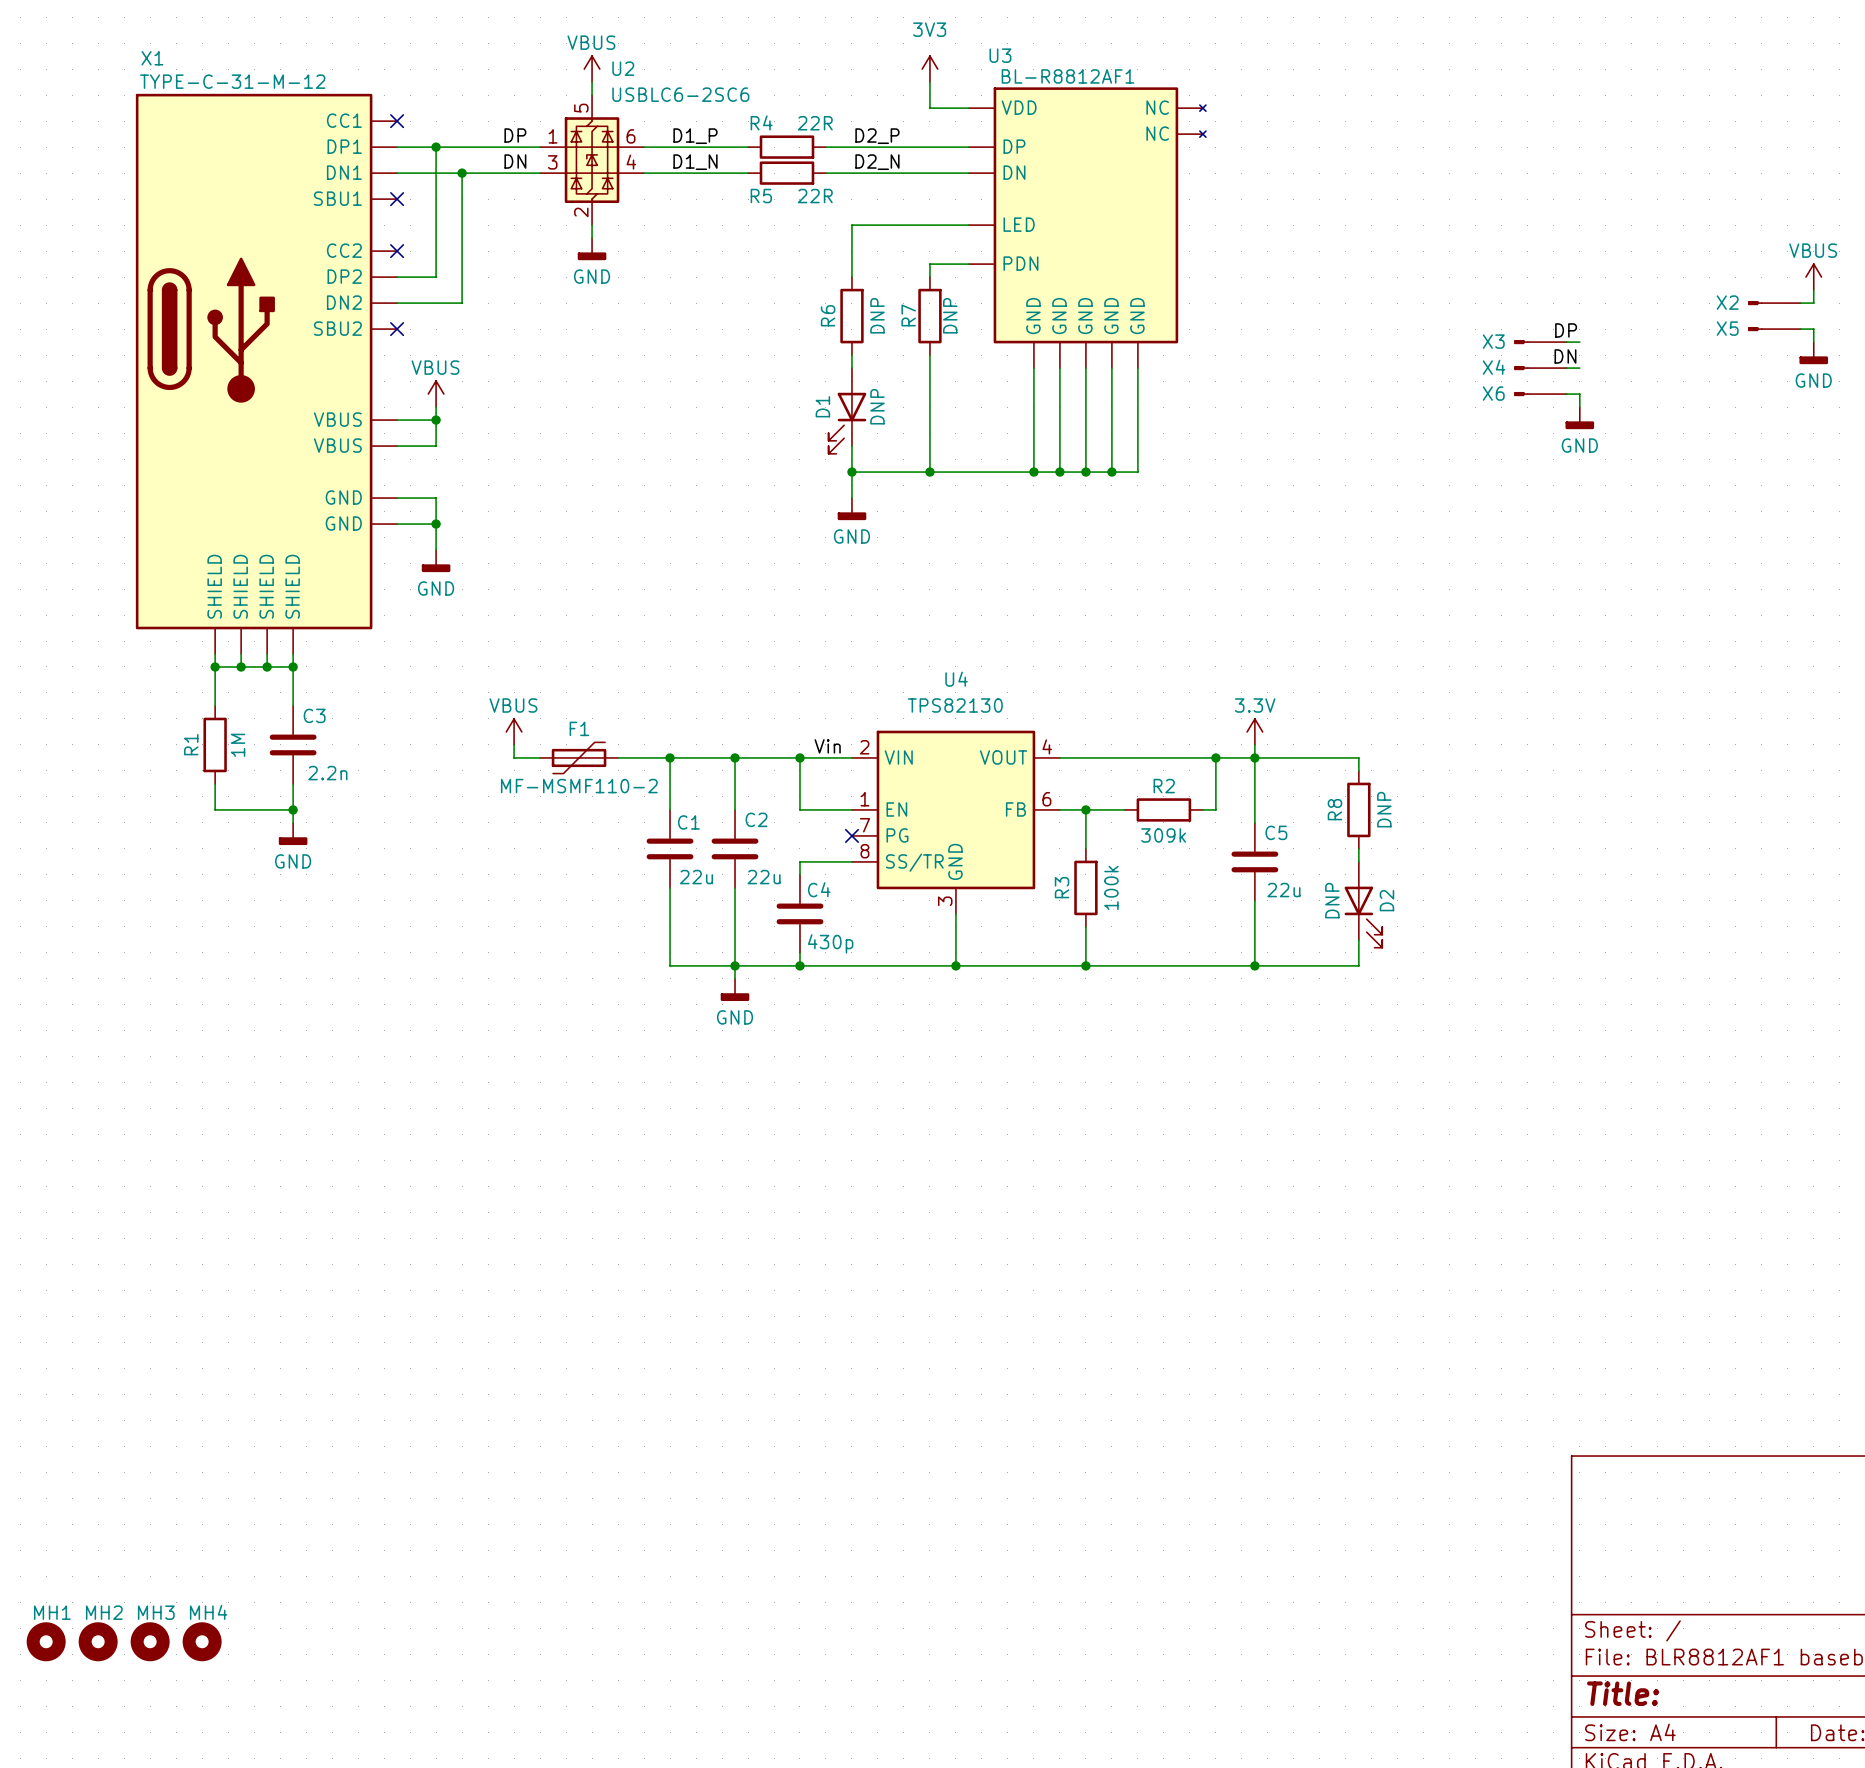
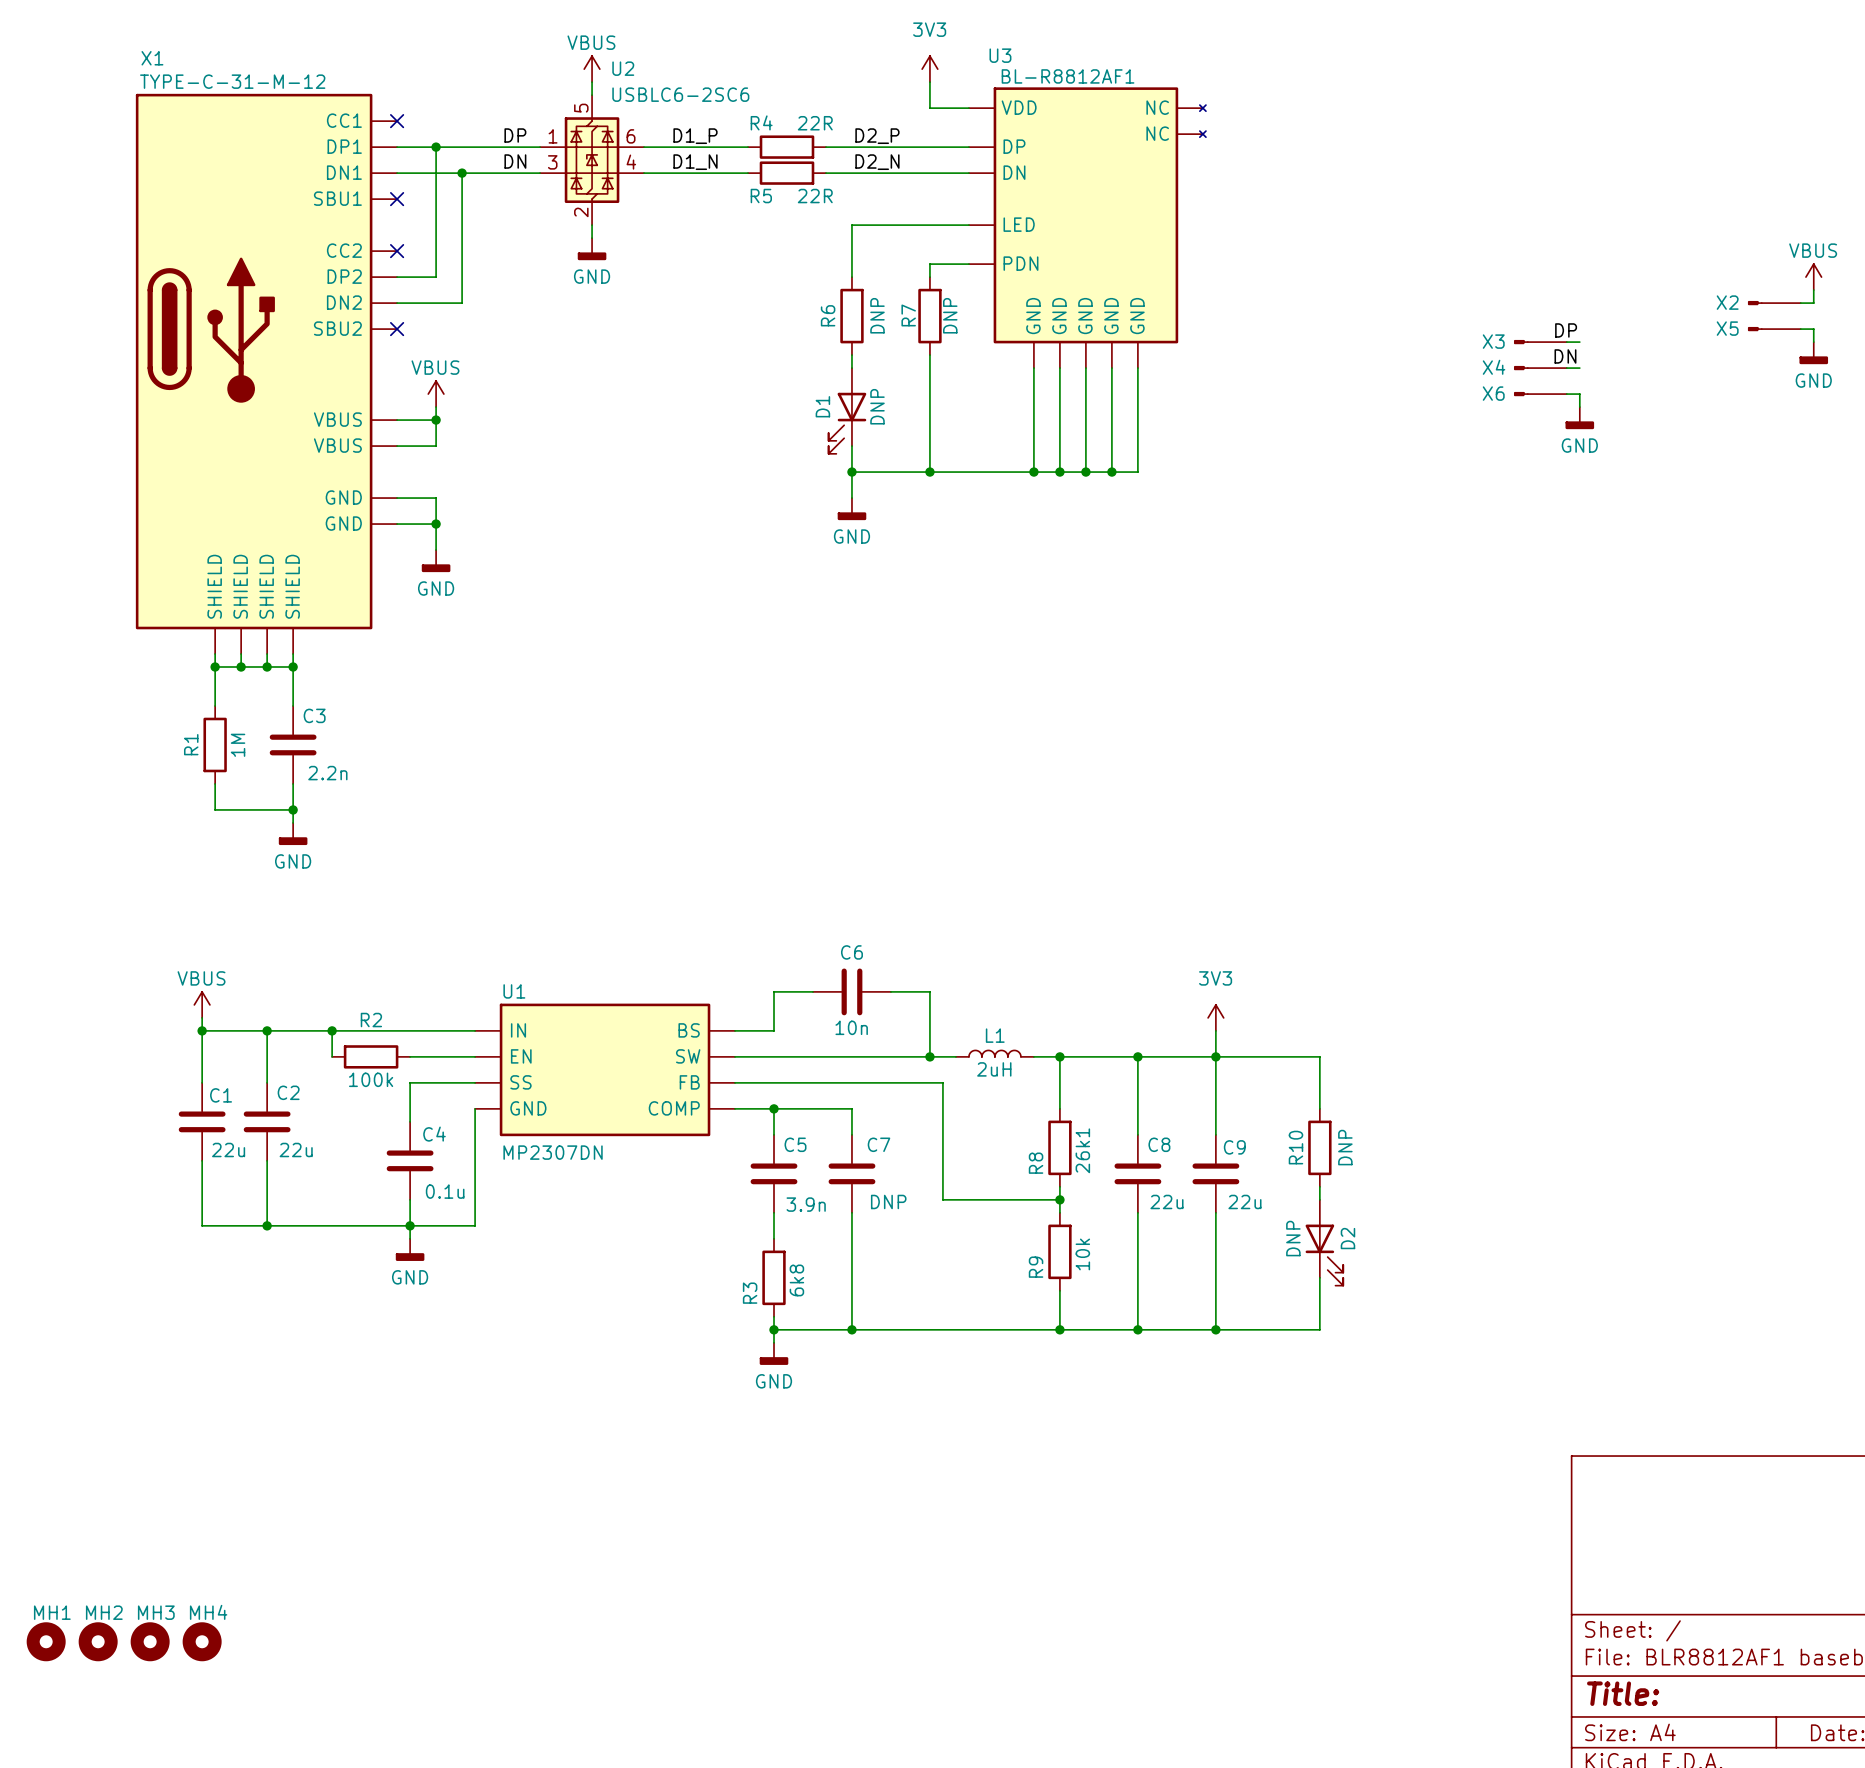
power symbol: VBUS (514, 731) -> none
power symbol: 3.3V (1254, 731) -> none
wire: (514, 744) (514, 757) (540, 757) -> none
wire: (1254, 744) (1254, 822) -> none
label: Vin (827, 746) -> none
F1: MF-MSMF110-2 (579, 757) -> none
wire: (618, 757) (851, 757) -> none
wire: (670, 757) (670, 809) -> none
junction: (670, 757) -> none
wire: (735, 757) (735, 809) -> none
junction: (735, 757) -> none
wire: (799, 757) (799, 809) (851, 809) -> none
junction: (799, 757) -> none
wire: (1059, 757) (1358, 757) (1358, 770) -> none
wire: (1215, 757) (1215, 809) (1202, 809) -> none
junction: (1215, 757) -> none
junction: (1254, 757) -> none
R2 name position: R2 (1164, 786) -> R2 (371, 1020)
wire: (1059, 809) (1124, 809) -> none
wire: (1085, 809) (1085, 848) -> none
junction: (1085, 809) -> none
R2 position: (1163, 809) -> (371, 1056)
R8 name position: R8 (1334, 809) -> R8 (1036, 1163)
R8 position: (1358, 809) -> (1059, 1147)
R8 value: DNP (1384, 809) -> 26k1 (1082, 1150)
U4: TPS82130 (955, 822) -> none
no-connect mark: (851, 835) -> none
R2 value: 309k (1163, 835) -> 100k (371, 1079)
C1 position: (670, 848) -> (202, 1121)
C2 position: (735, 848) -> (267, 1121)
wire: (1358, 848) (1358, 861) -> none
wire: (851, 861) (799, 861) (799, 874) -> none
C5 position: (1254, 861) -> (774, 1173)
wire: (670, 887) (670, 965) (1358, 965) (1358, 939) -> none
wire: (735, 887) (735, 978) -> none
R3 name position: R3 (1062, 887) -> R3 (750, 1293)
R3 position: (1085, 887) -> (774, 1277)
R3 value: 100k (1111, 887) -> 6k8 (796, 1280)
C4 name position: C4 (819, 889) -> C4 (434, 1134)
C5 value: 22u (1283, 890) -> 3.9n (806, 1204)
wire: (1254, 900) (1254, 965) -> none
D2 position: (1363, 904) -> (1324, 1242)
C4 position: (799, 913) -> (410, 1160)
wire: (955, 913) (955, 965) -> (1059, 1056) (1059, 1108)
wire: (1085, 926) (1085, 965) -> none
C4 value: 430p (830, 943) -> 0.1u (445, 1191)
wire: (799, 952) (799, 965) -> none
junction: (735, 965) -> none
junction: (799, 965) -> none
junction: (955, 965) -> none
junction: (1085, 965) -> none
junction: (1254, 965) -> none
power symbol: GND (735, 989) -> none
wire: none -> (812, 991) (774, 991) (774, 1030) (735, 1030)
C6: none -> 10n (851, 991)
wire: none -> (890, 991) (929, 991) (929, 1056)
power symbol: none -> VBUS (202, 1004)
wire: none -> (202, 1017) (202, 1082)
power symbol: none -> 3V3 (1215, 1017)
wire: none -> (202, 1030) (475, 1030)
junction: none -> (202, 1030)
wire: none -> (267, 1030) (267, 1082)
junction: none -> (267, 1030)
wire: none -> (332, 1030) (332, 1056)
junction: none -> (332, 1030)
wire: none -> (1215, 1030) (1215, 1134)
L1: none -> 2uH (994, 1053)
wire: none -> (410, 1056) (475, 1056)
wire: none -> (735, 1056) (955, 1056)
junction: none -> (929, 1056)
wire: none -> (1033, 1056) (1319, 1056) (1319, 1108)
junction: none -> (1059, 1056)
wire: none -> (1137, 1056) (1137, 1134)
junction: none -> (1137, 1056)
junction: none -> (1215, 1056)
U1: none -> MP2307DN (605, 1069)
wire: none -> (475, 1082) (410, 1082) (410, 1121)
wire: none -> (735, 1082) (942, 1082) (942, 1199) (1059, 1199)
wire: none -> (475, 1108) (475, 1225) (202, 1225) (202, 1160)
wire: none -> (735, 1108) (851, 1108) (851, 1134)
wire: none -> (774, 1108) (774, 1134)
junction: none -> (774, 1108)
R10: none -> DNP (1319, 1147)
wire: none -> (267, 1160) (267, 1225)
C7: none -> DNP (851, 1173)
C8: none -> 22u (1137, 1173)
C9: none -> 22u (1215, 1173)
wire: none -> (1059, 1186) (1059, 1212)
wire: none -> (1319, 1186) (1319, 1199)
wire: none -> (410, 1199) (410, 1238)
junction: none -> (1059, 1199)
wire: none -> (774, 1212) (774, 1238)
wire: none -> (851, 1212) (851, 1329)
wire: none -> (1137, 1212) (1137, 1329)
wire: none -> (1215, 1212) (1215, 1329)
junction: none -> (267, 1225)
junction: none -> (410, 1225)
power symbol: none -> GND (410, 1249)
R9: none -> 10k (1059, 1251)
wire: none -> (1319, 1277) (1319, 1329) (774, 1329)
wire: none -> (1059, 1290) (1059, 1329)
wire: none -> (774, 1316) (774, 1342)
junction: none -> (774, 1329)
junction: none -> (851, 1329)
junction: none -> (1059, 1329)
junction: none -> (1137, 1329)
junction: none -> (1215, 1329)
power symbol: none -> GND (774, 1353)

